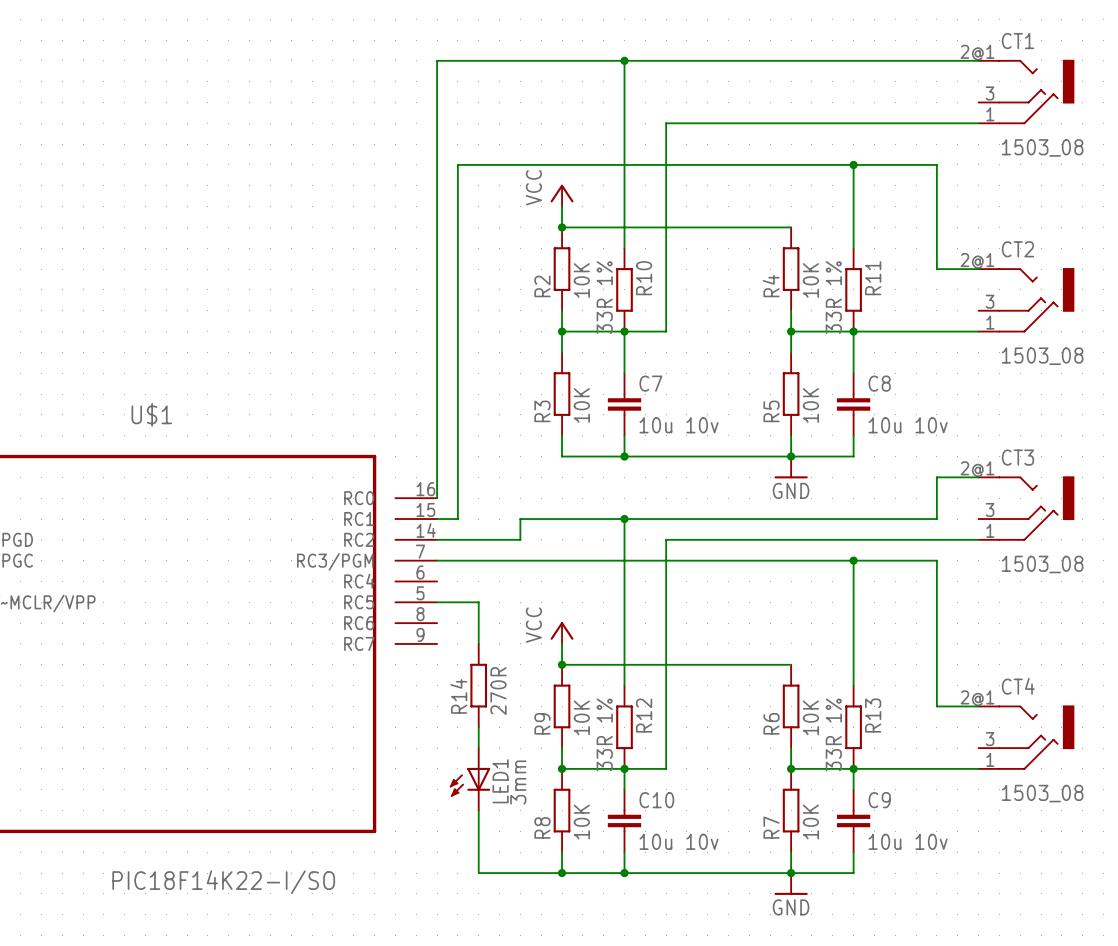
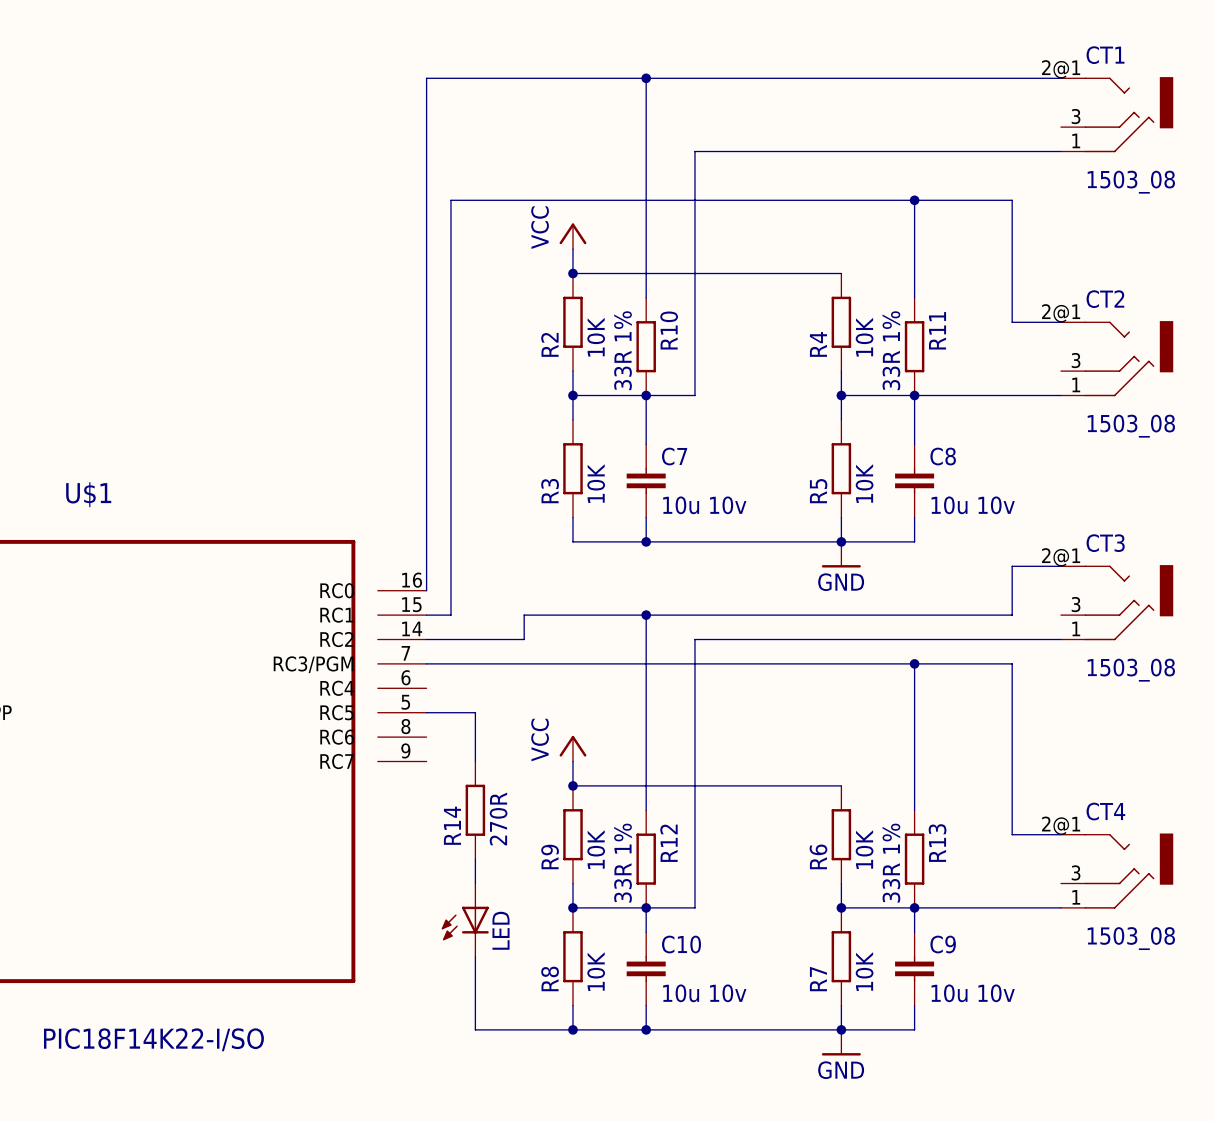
LED1 name: LED1 (500, 781) -> LED (501, 930)
LED1 value: 3mm (518, 782) -> none

